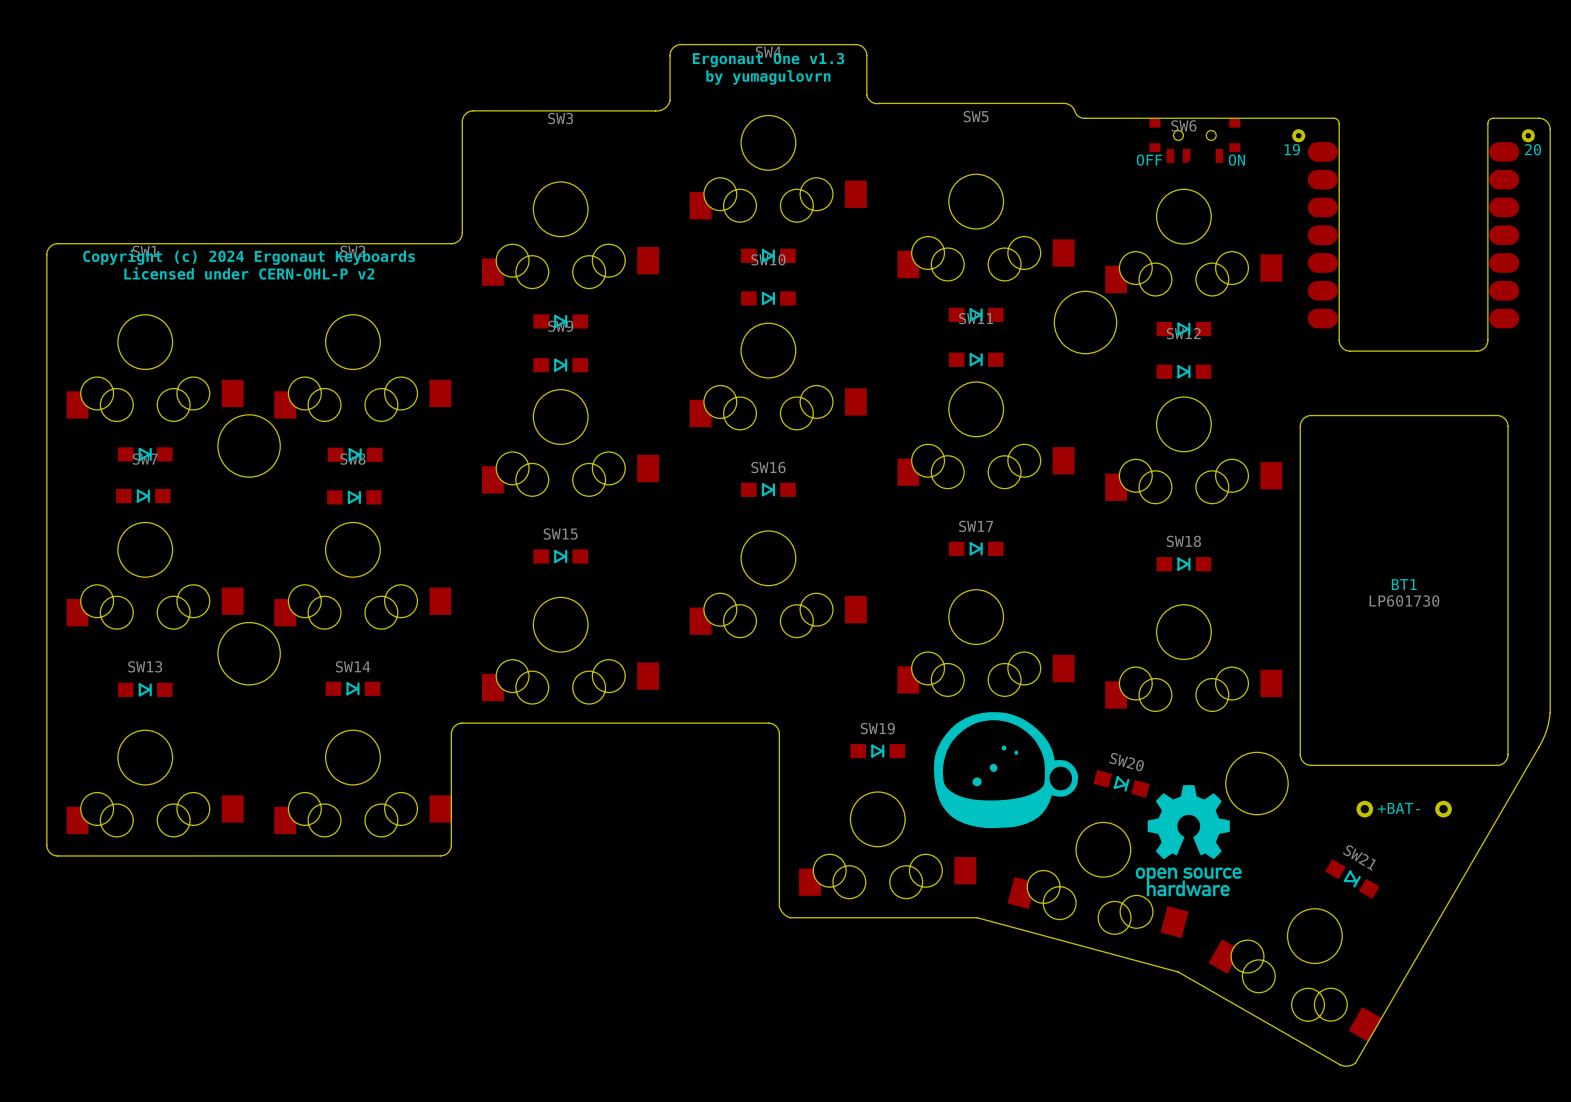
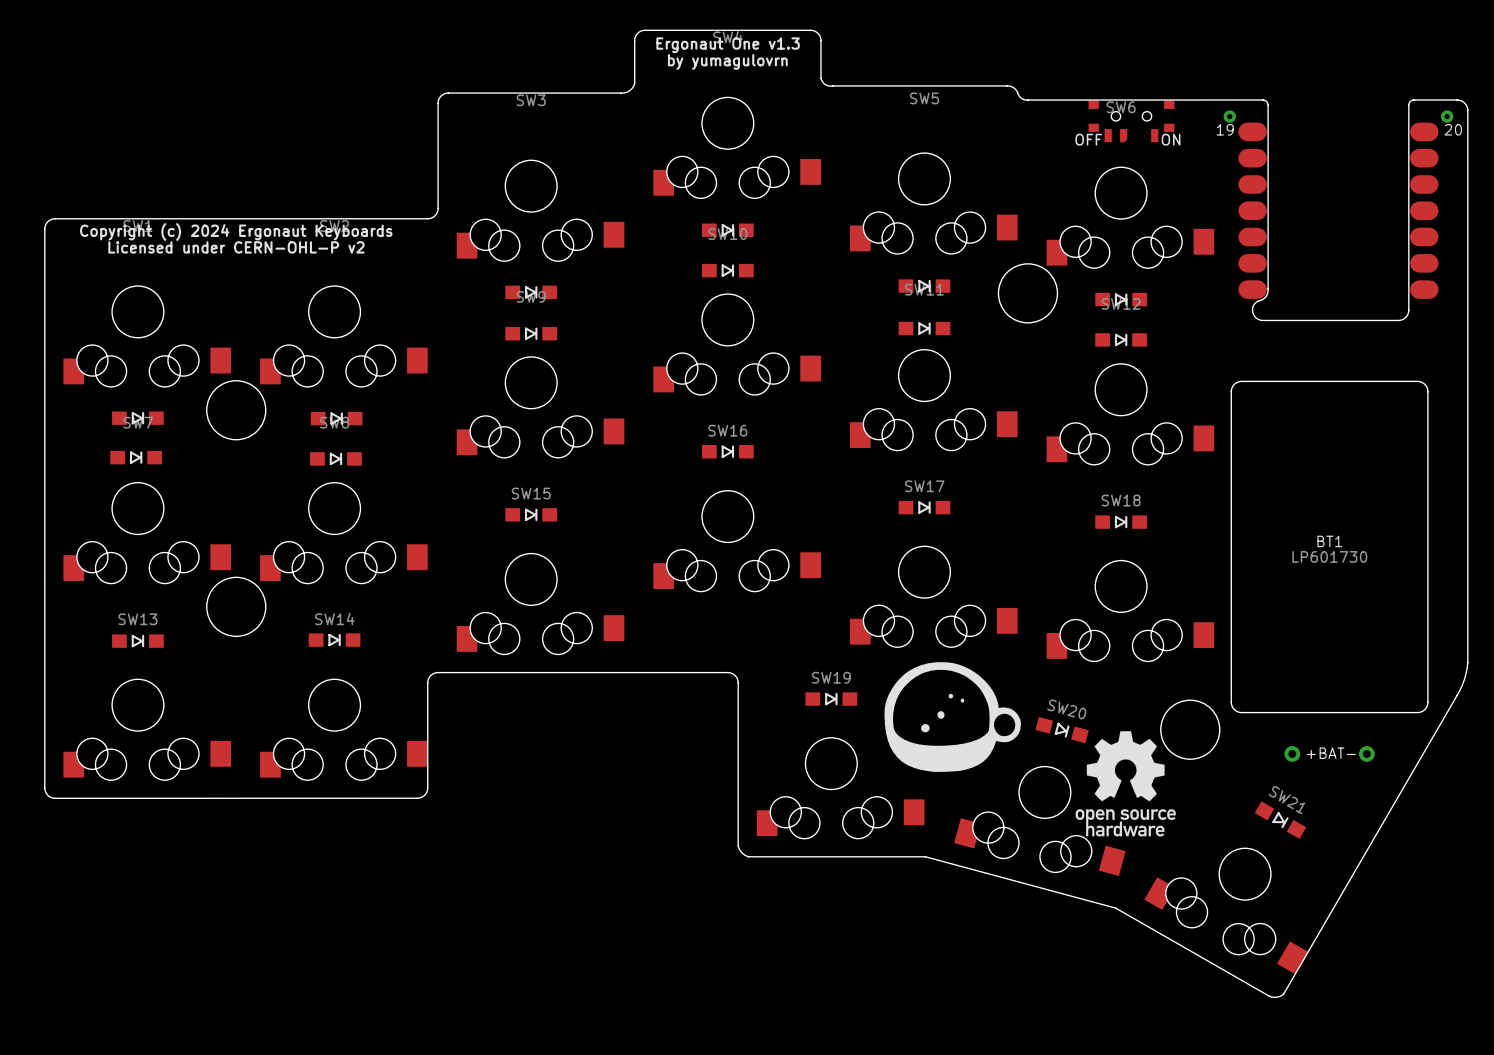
part footprint: [1292, 117, 1535, 352] -> [1223, 99, 1454, 322]

